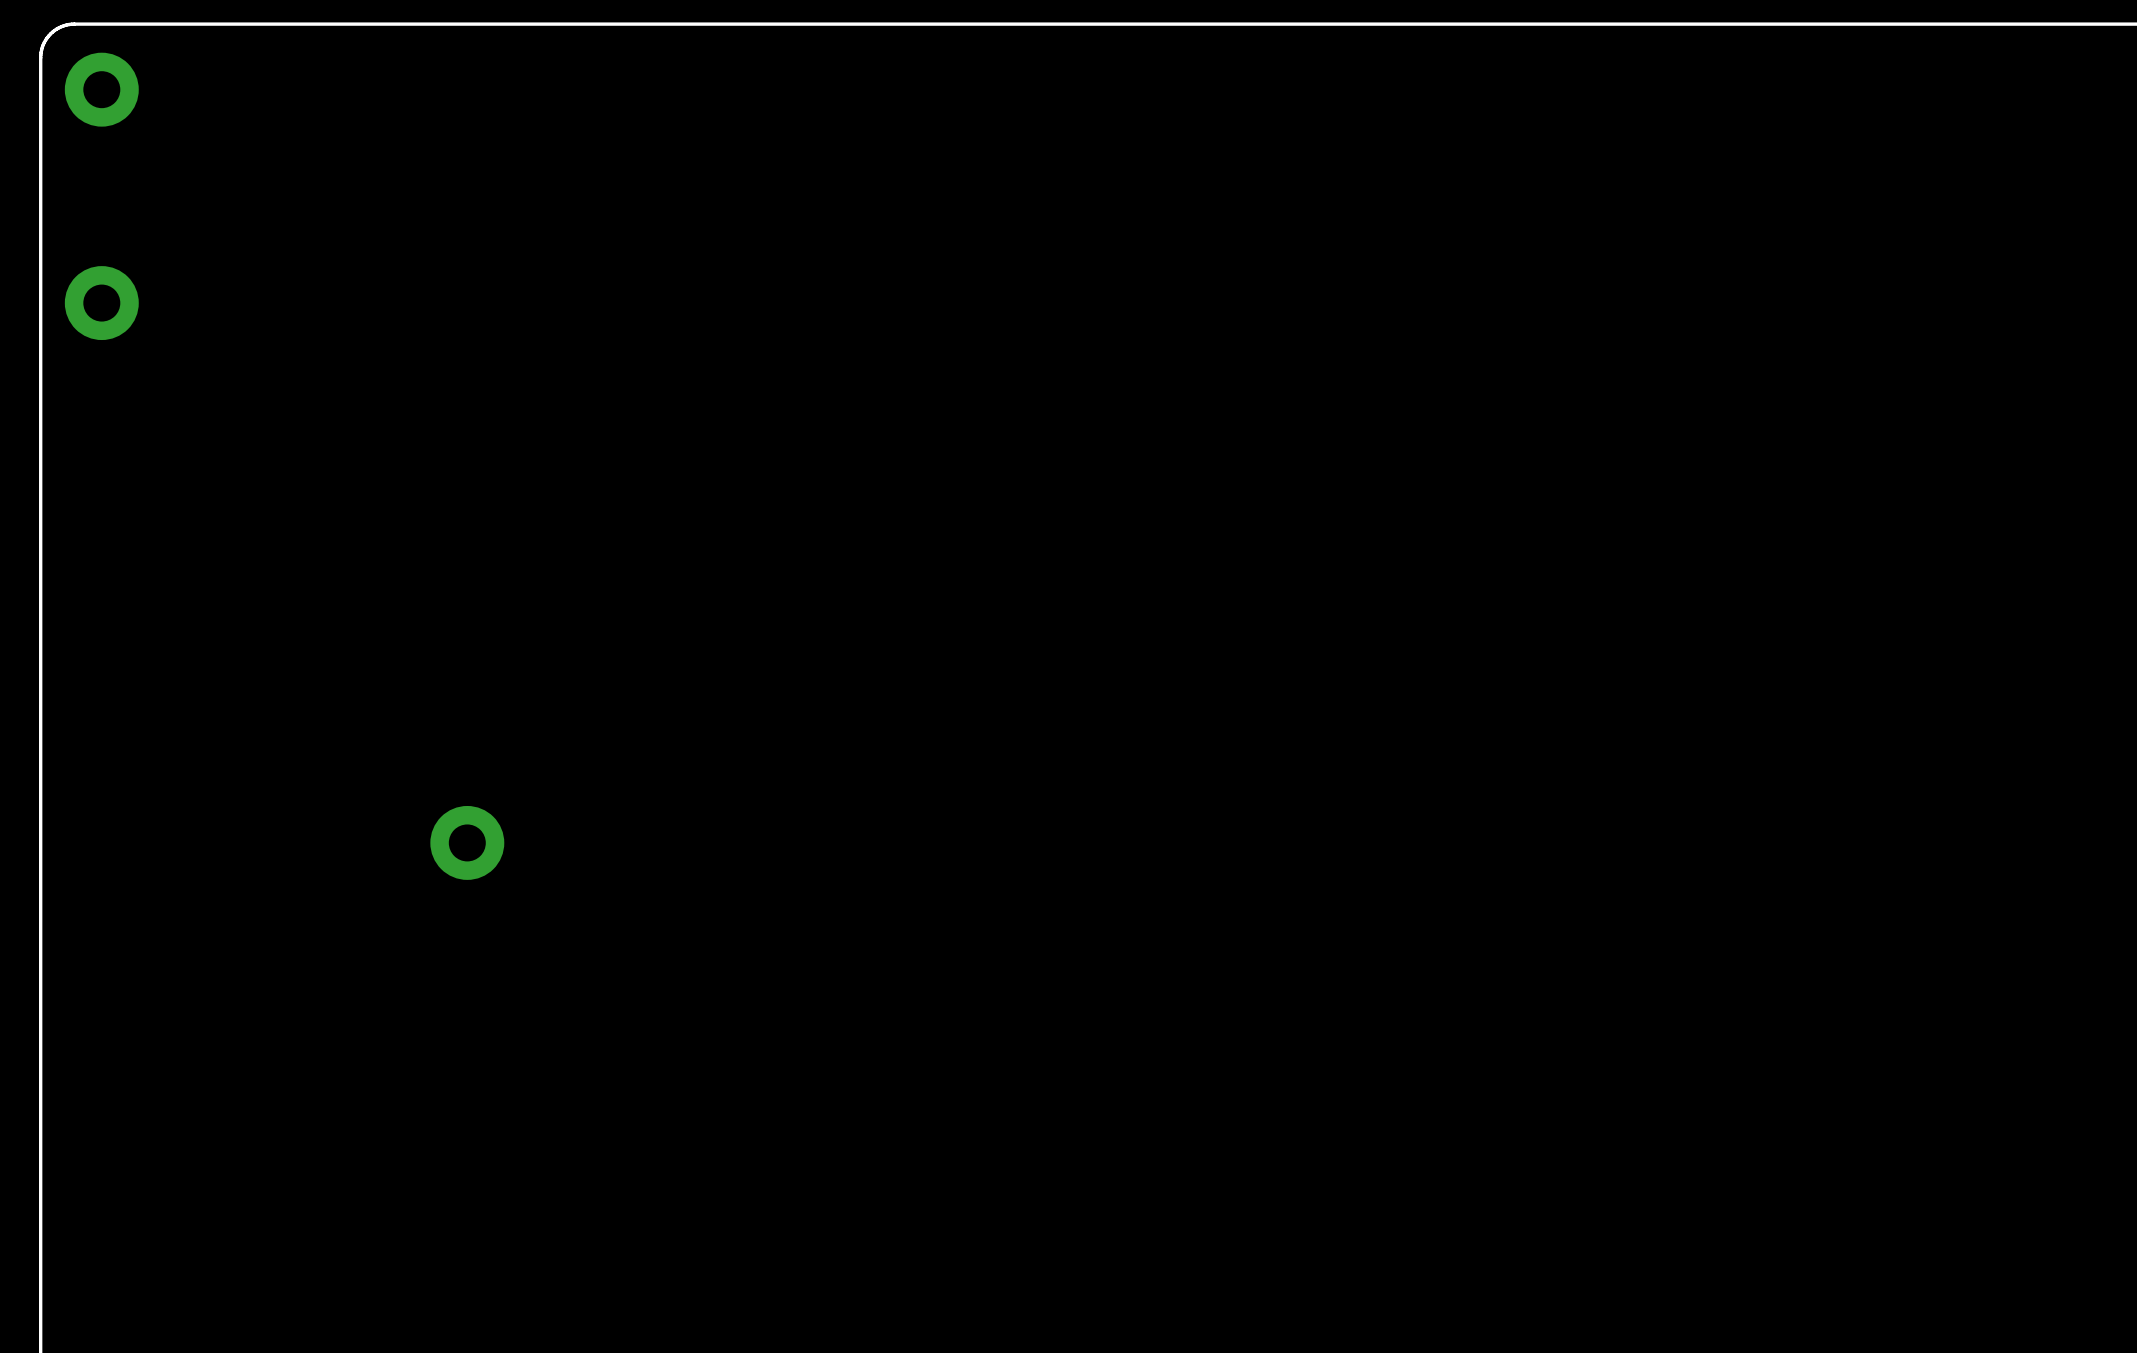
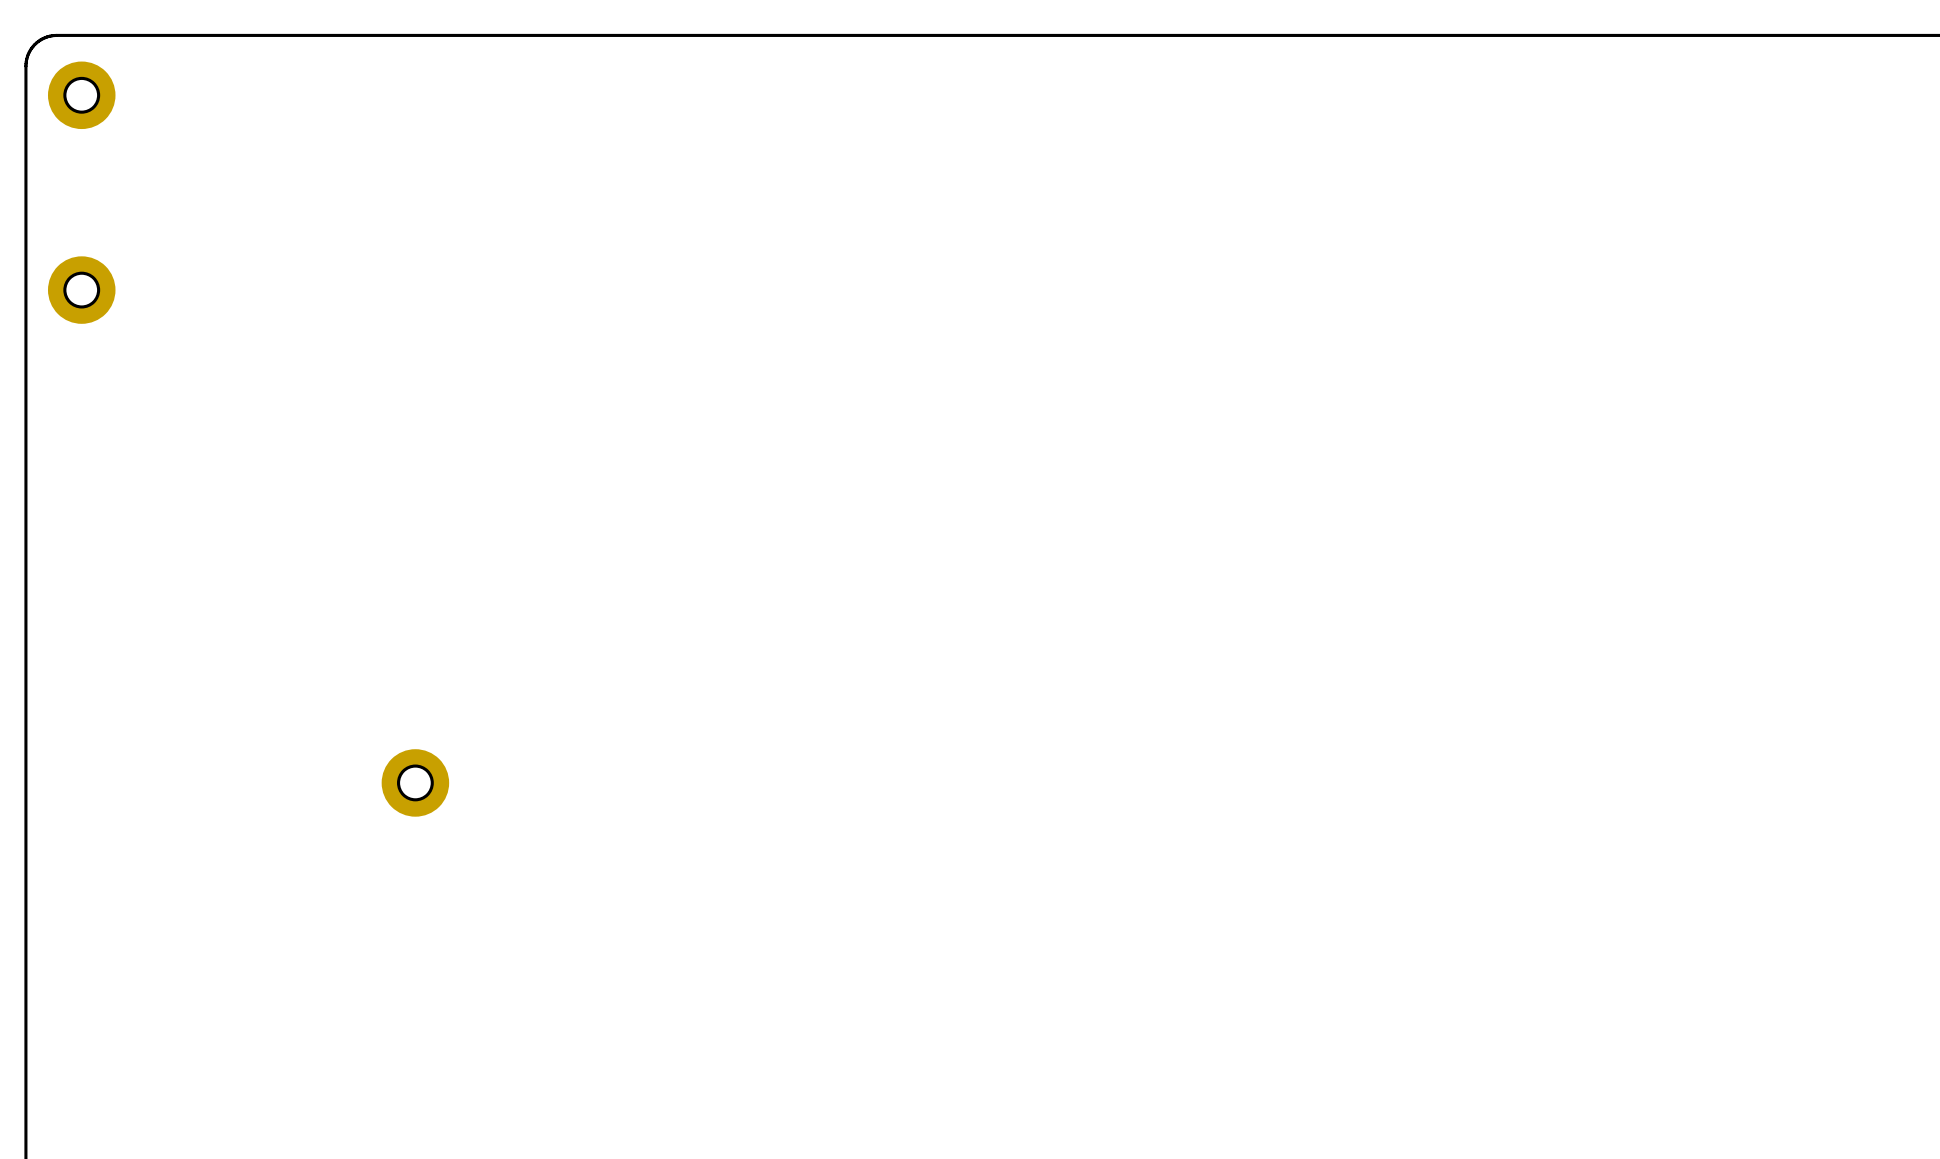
round board edge: none -> [63, 76, 101, 114]
round board edge: none -> [63, 271, 101, 309]
round board edge: none -> [397, 764, 434, 802]

